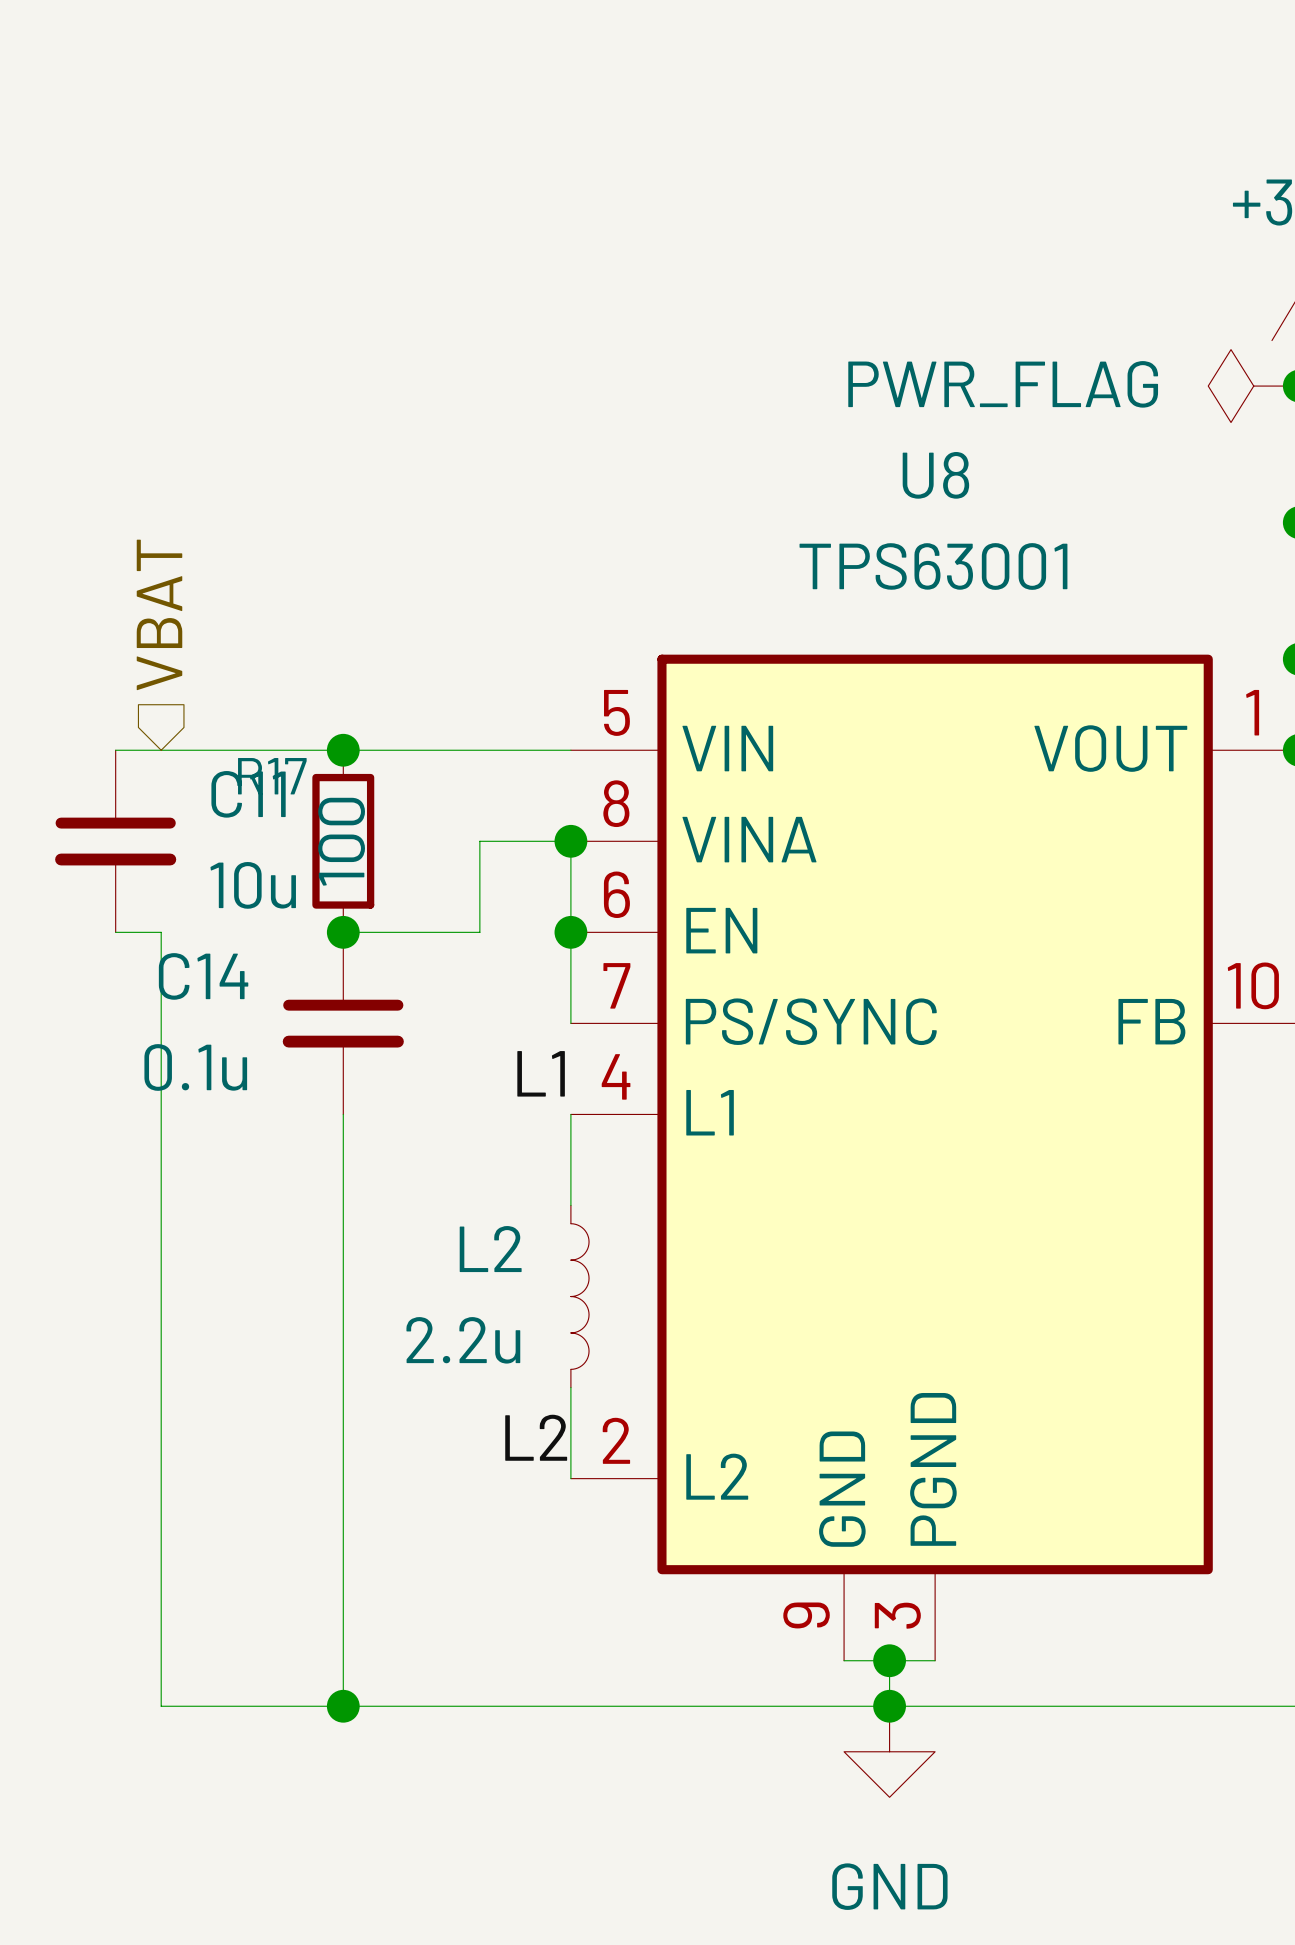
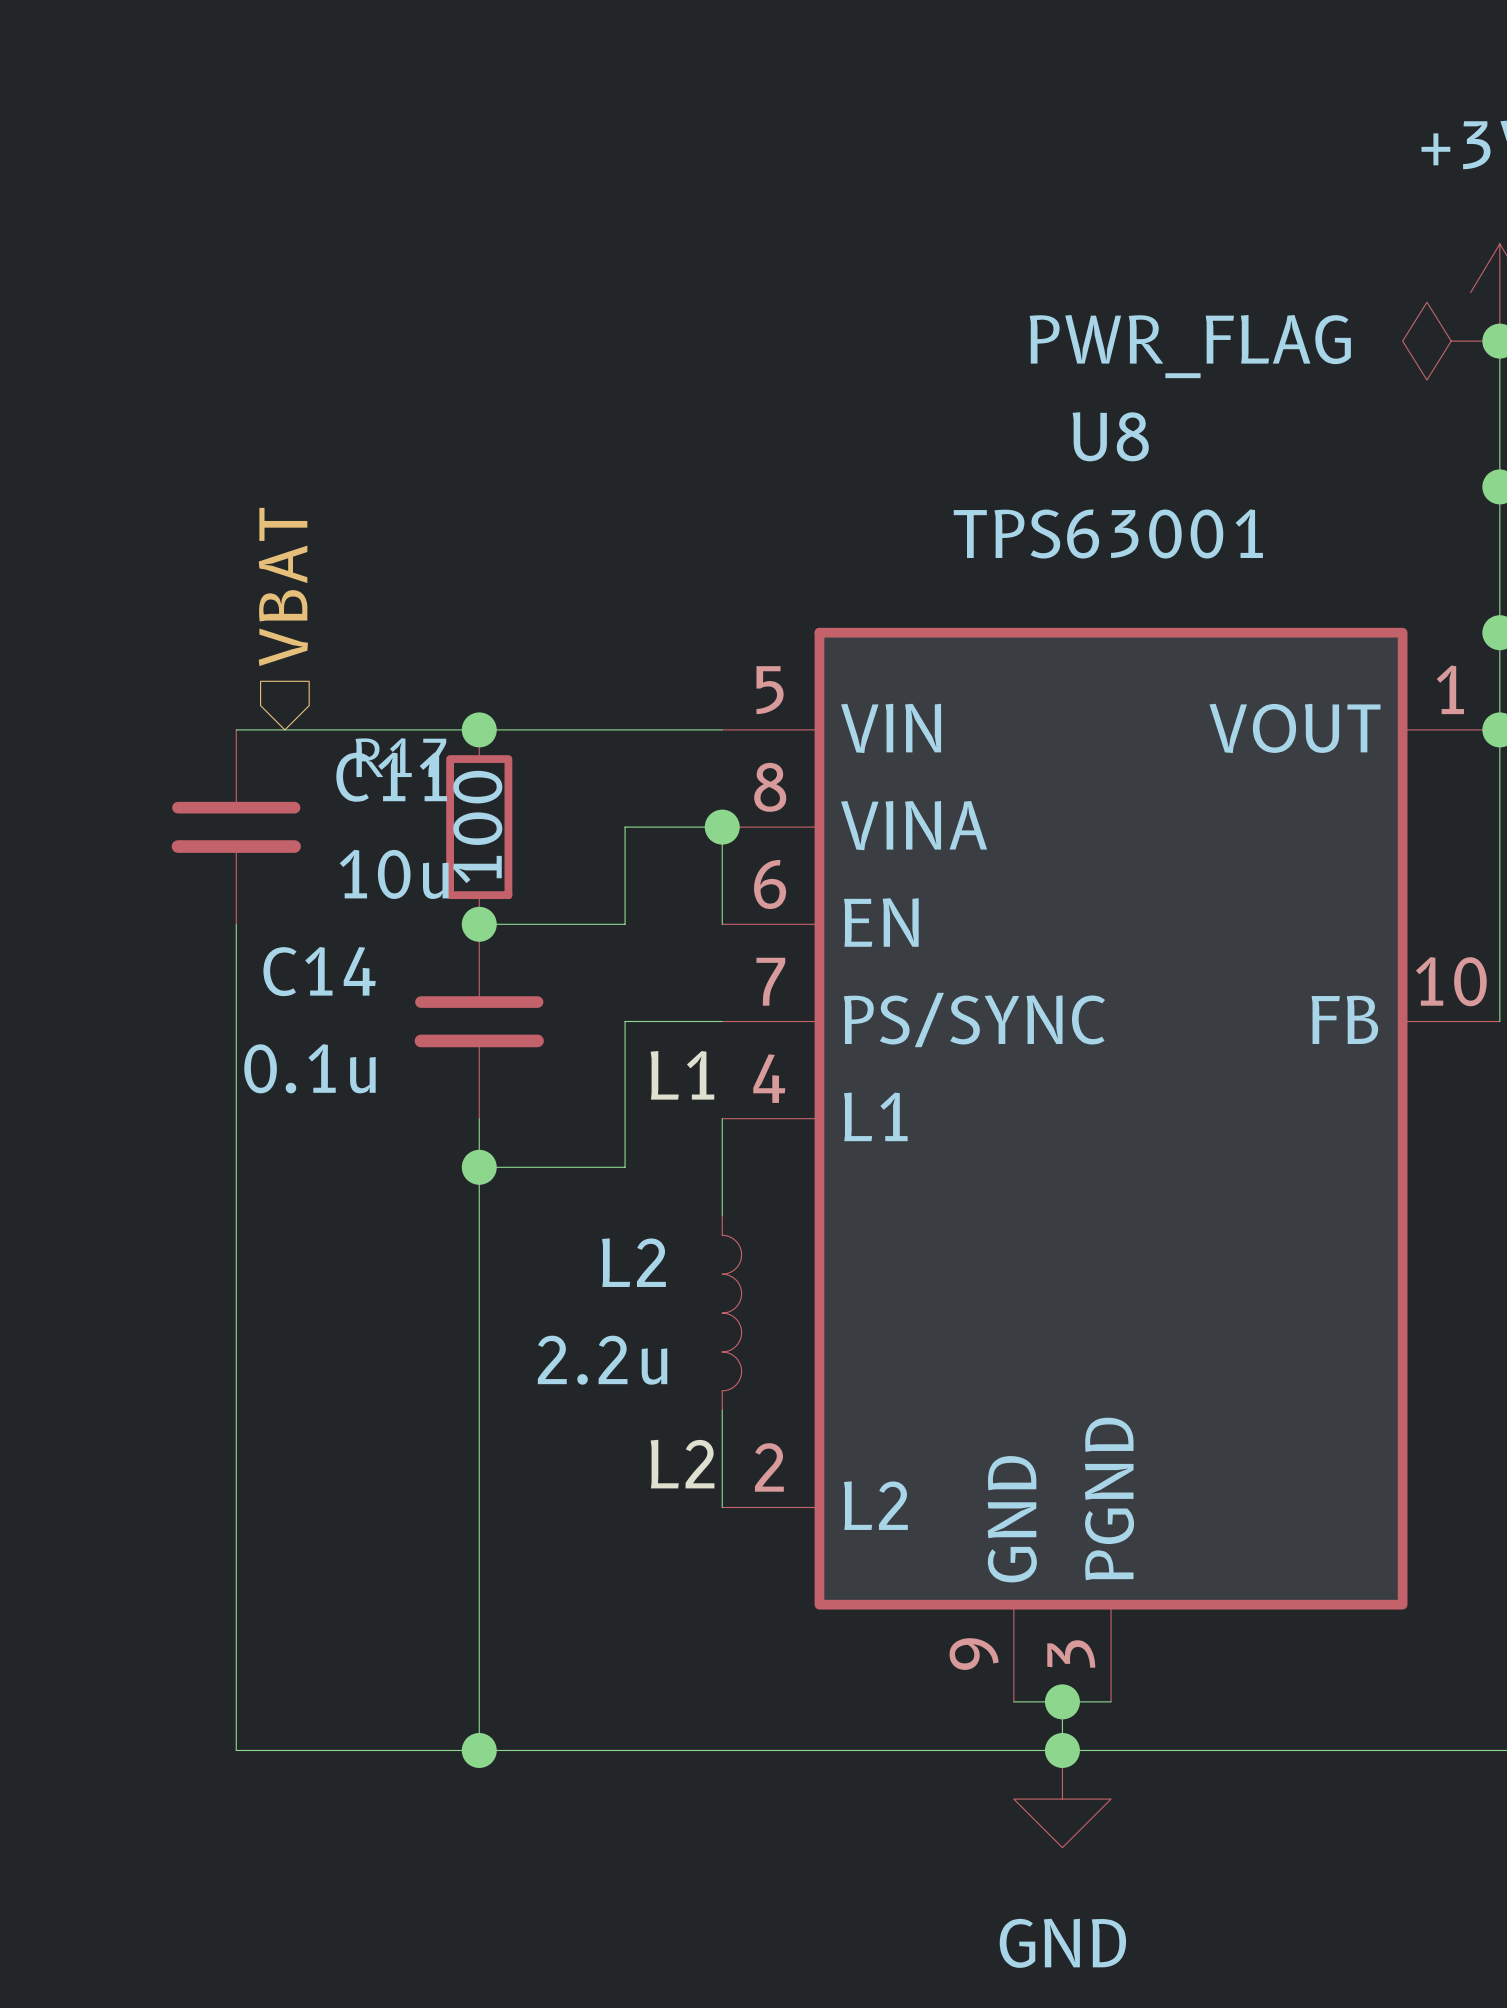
wire: (115, 932) (161, 932) (161, 1706) -> (236, 924) (236, 1750) (284, 1750)
wire: (570, 932) (570, 1023) -> (479, 1167) (625, 1167) (625, 1021) (722, 1021)
junction: (570, 932) -> none
junction: none -> (479, 1167)

